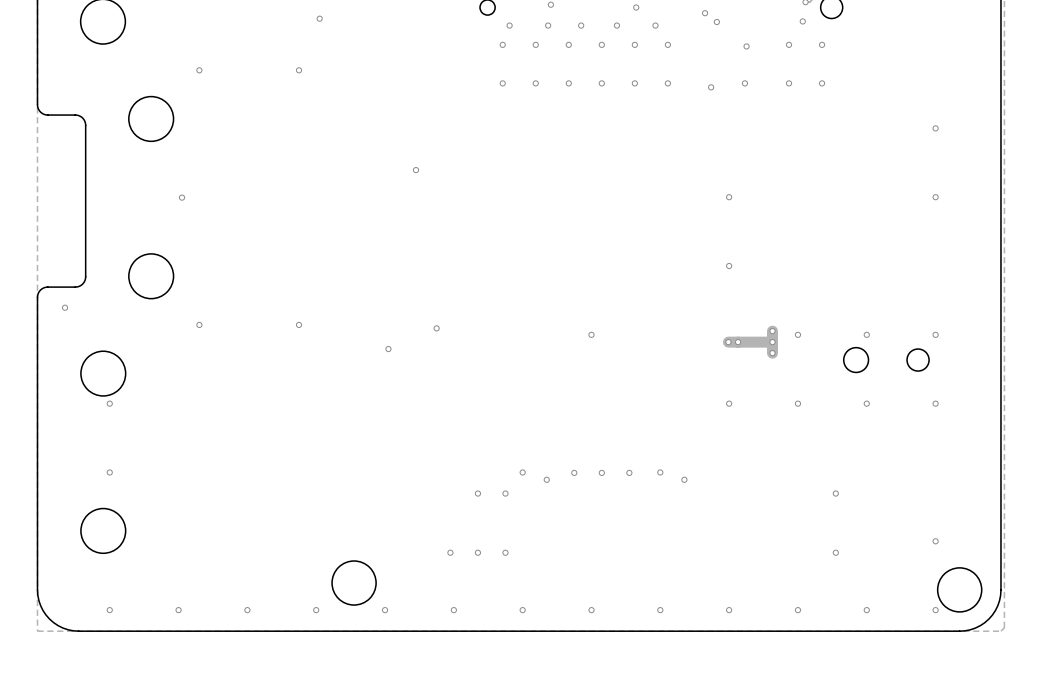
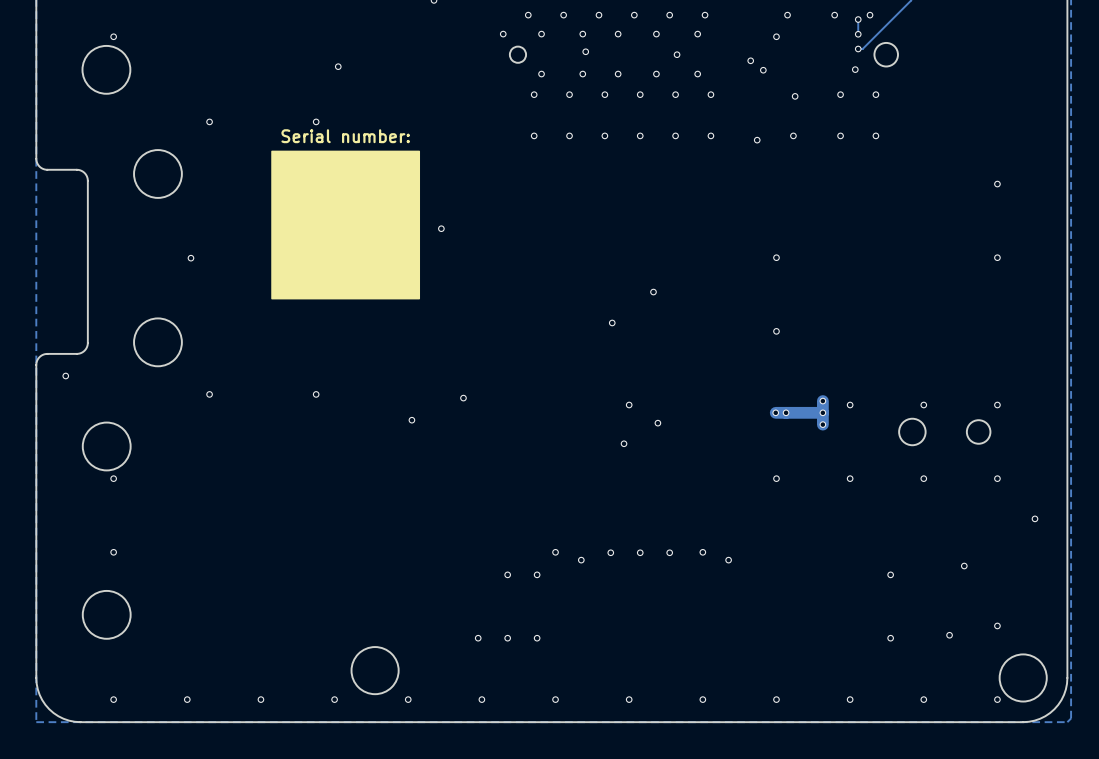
text: none -> Serial number: (345, 136)
drawing: none -> [271, 150, 421, 300]
via: none -> (653, 292)
via: none -> (612, 322)
via: none -> (657, 423)
via: none -> (624, 443)
via: none -> (1034, 518)
via: none -> (964, 566)
via: none -> (949, 635)

